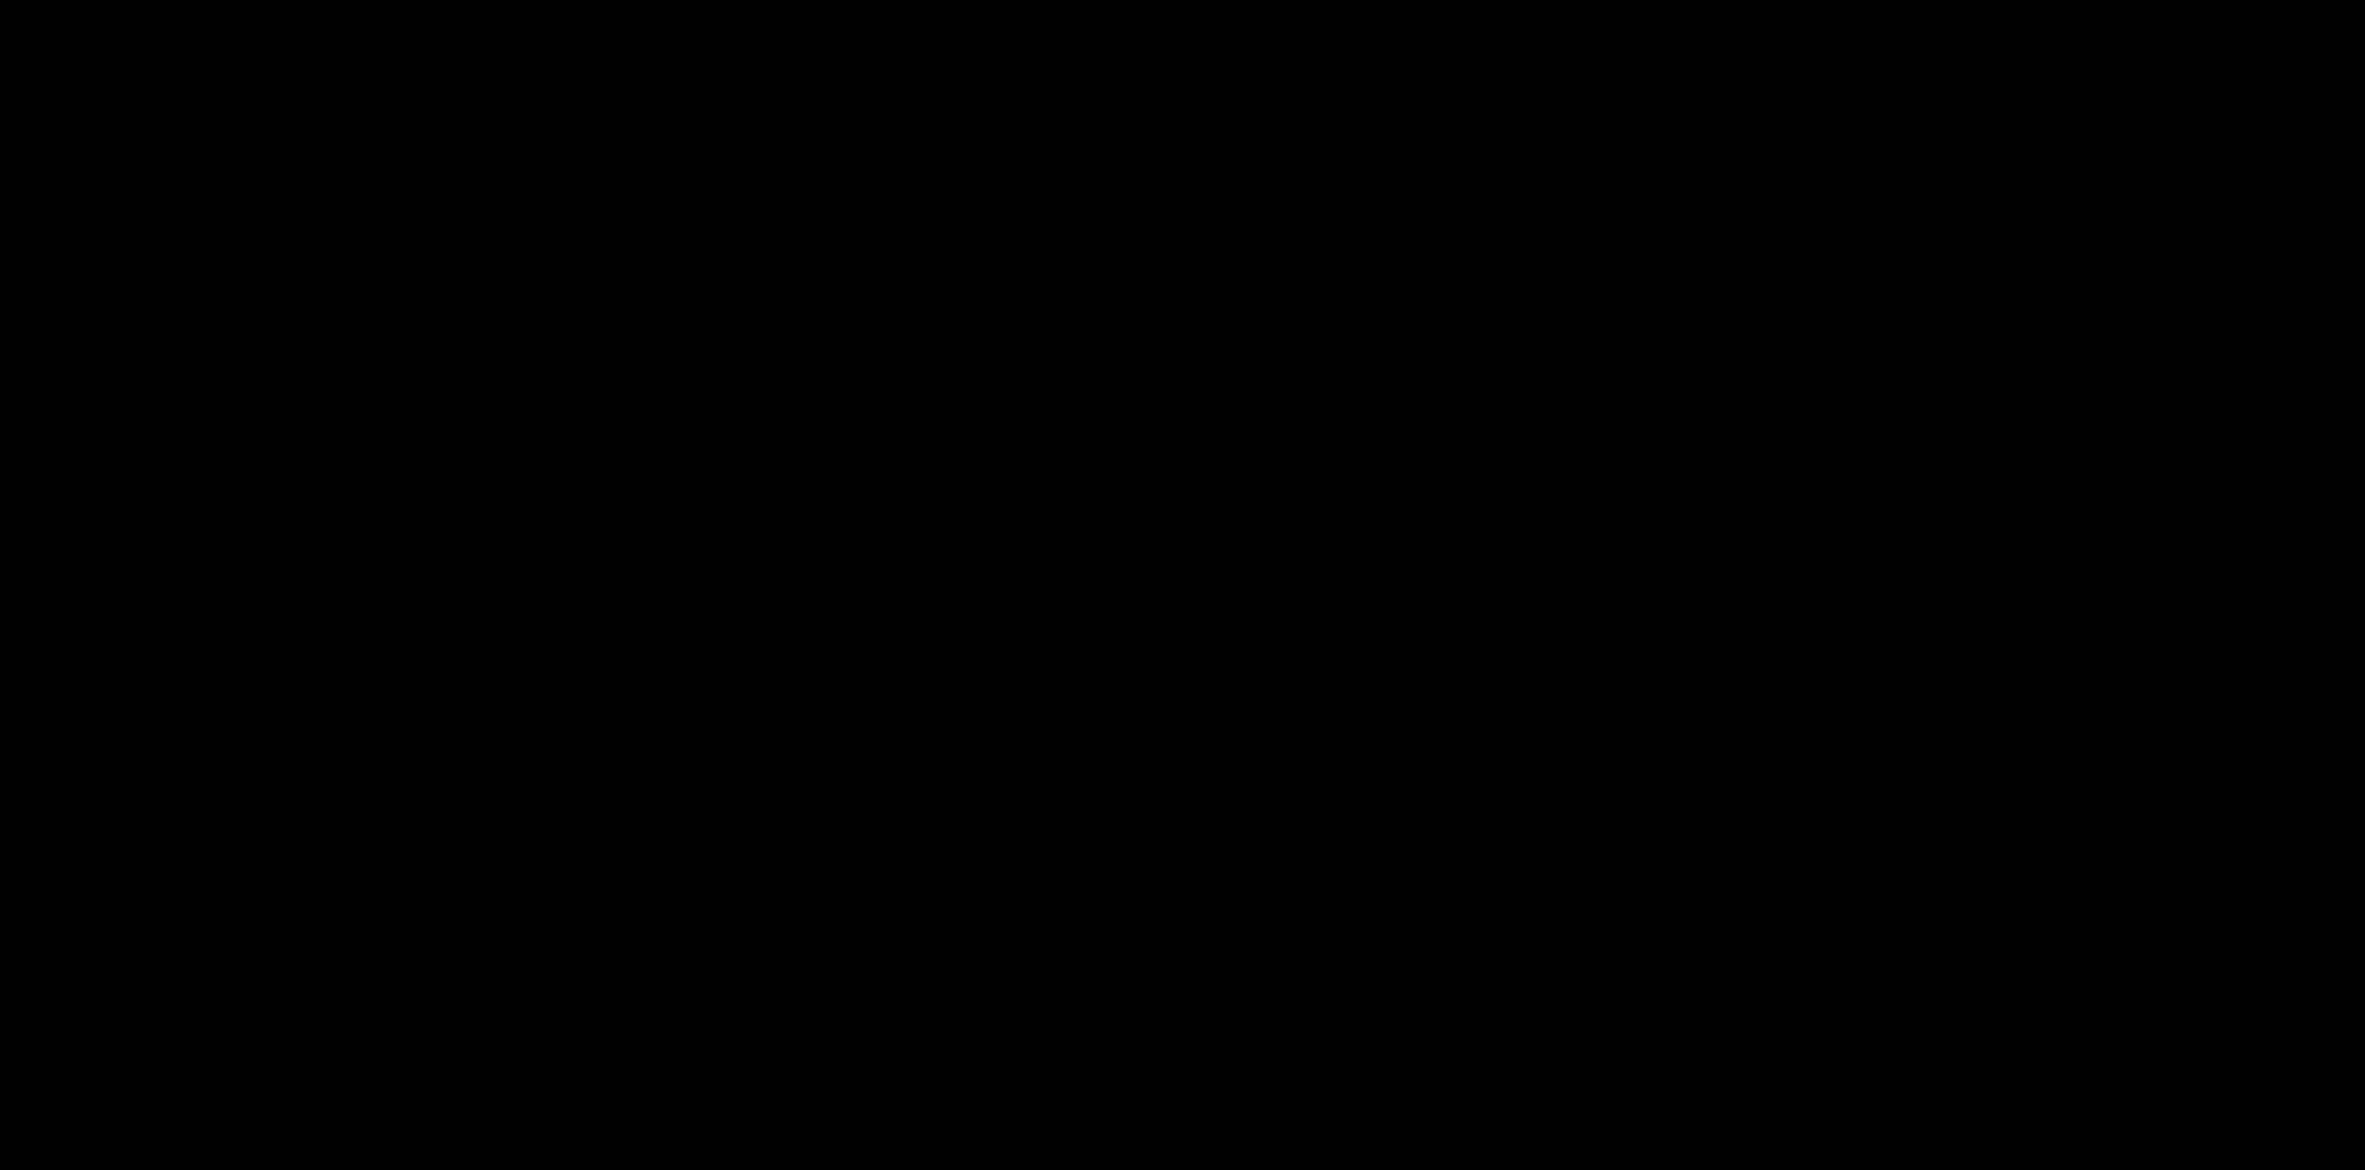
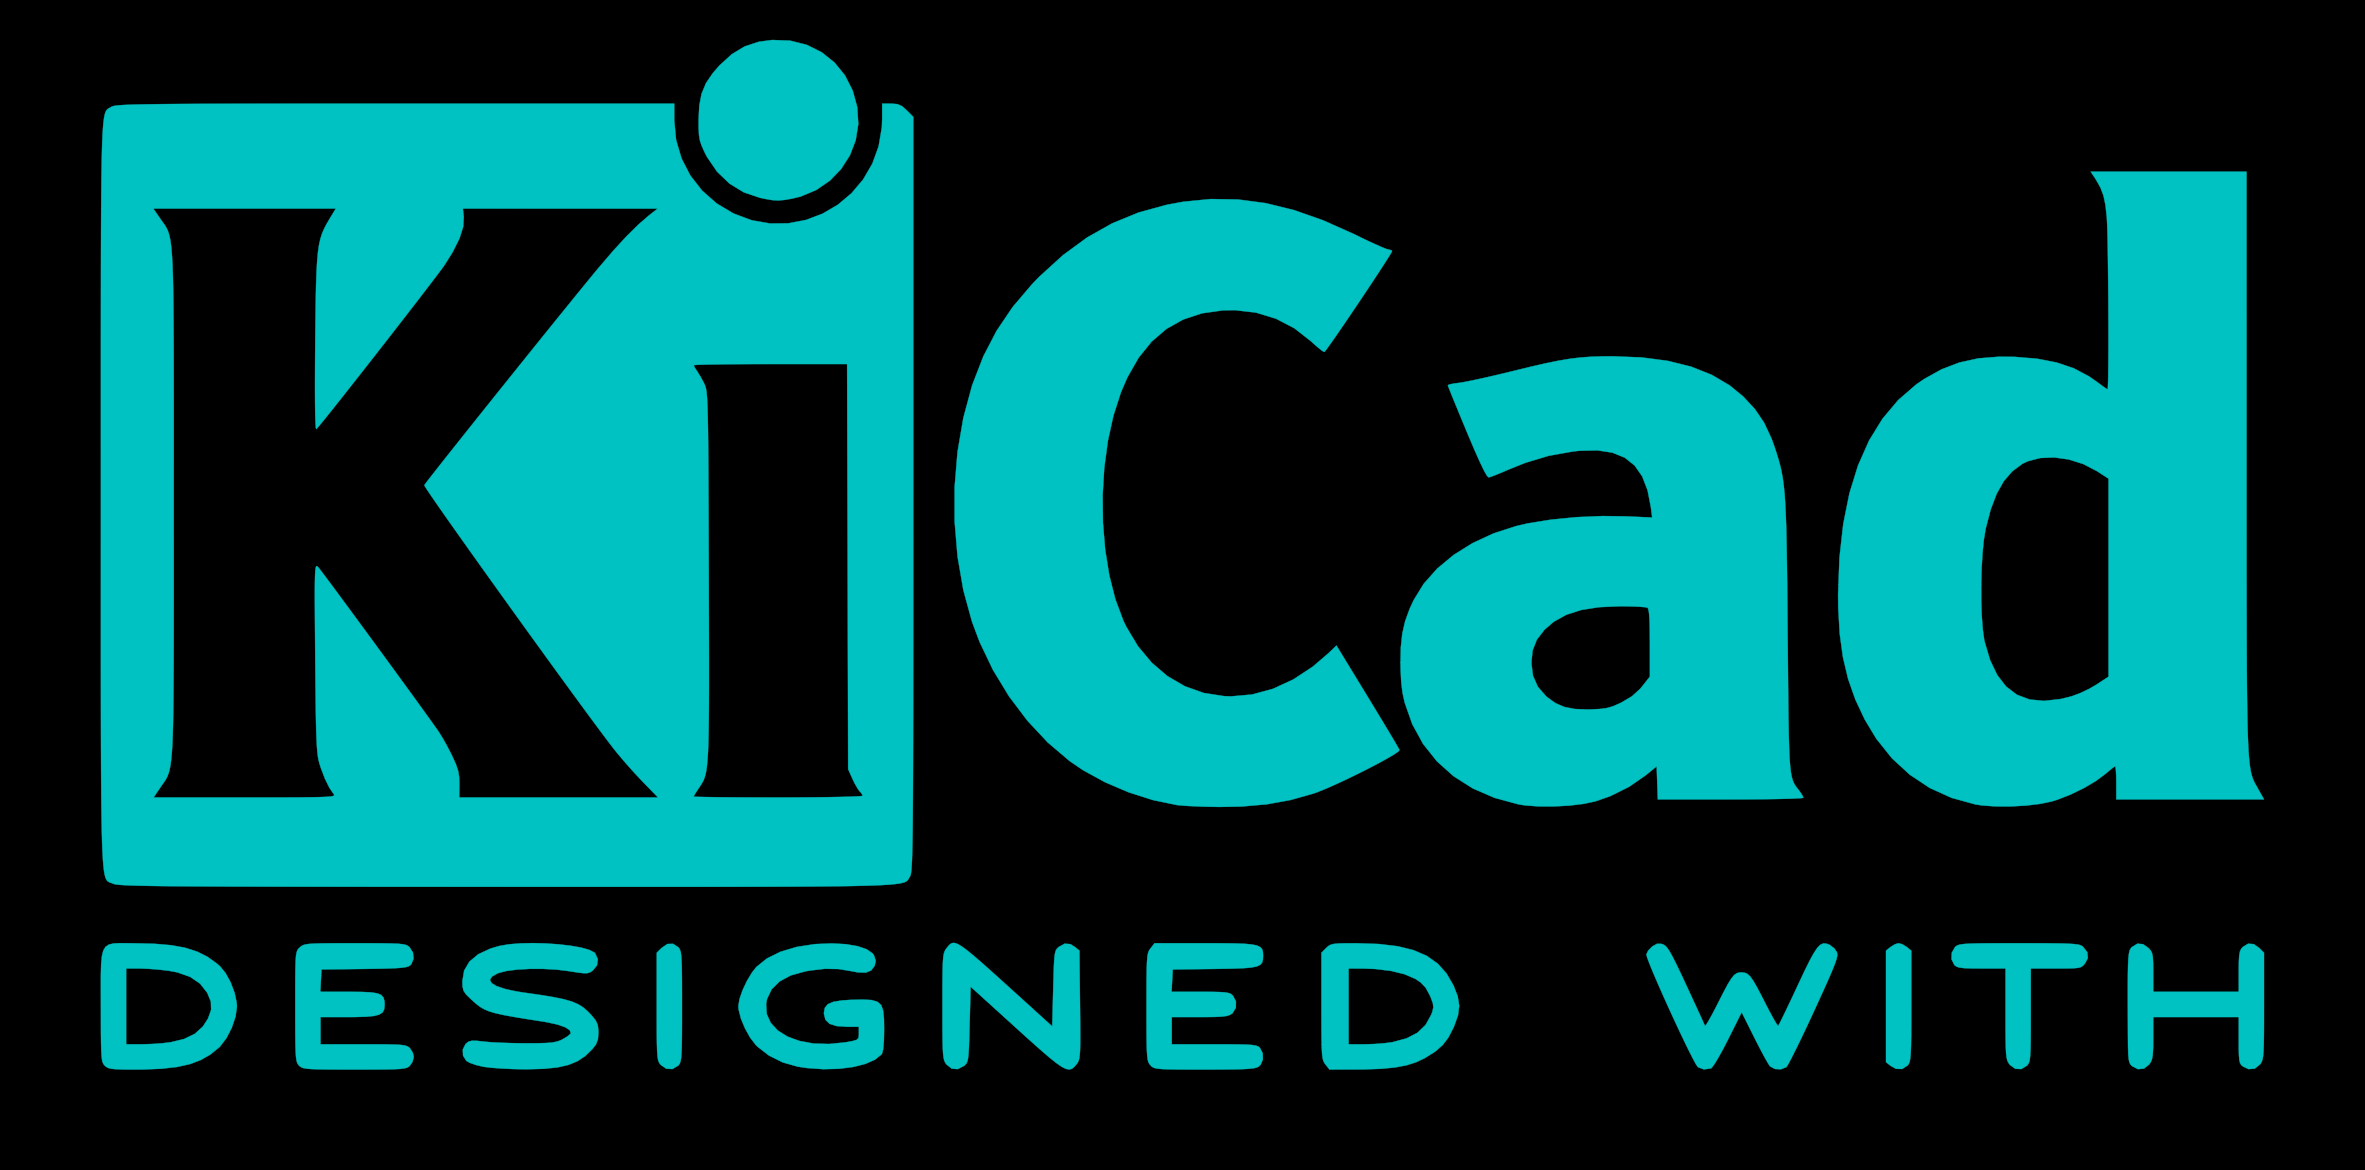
drawing: none -> [100, 39, 2265, 1070]

